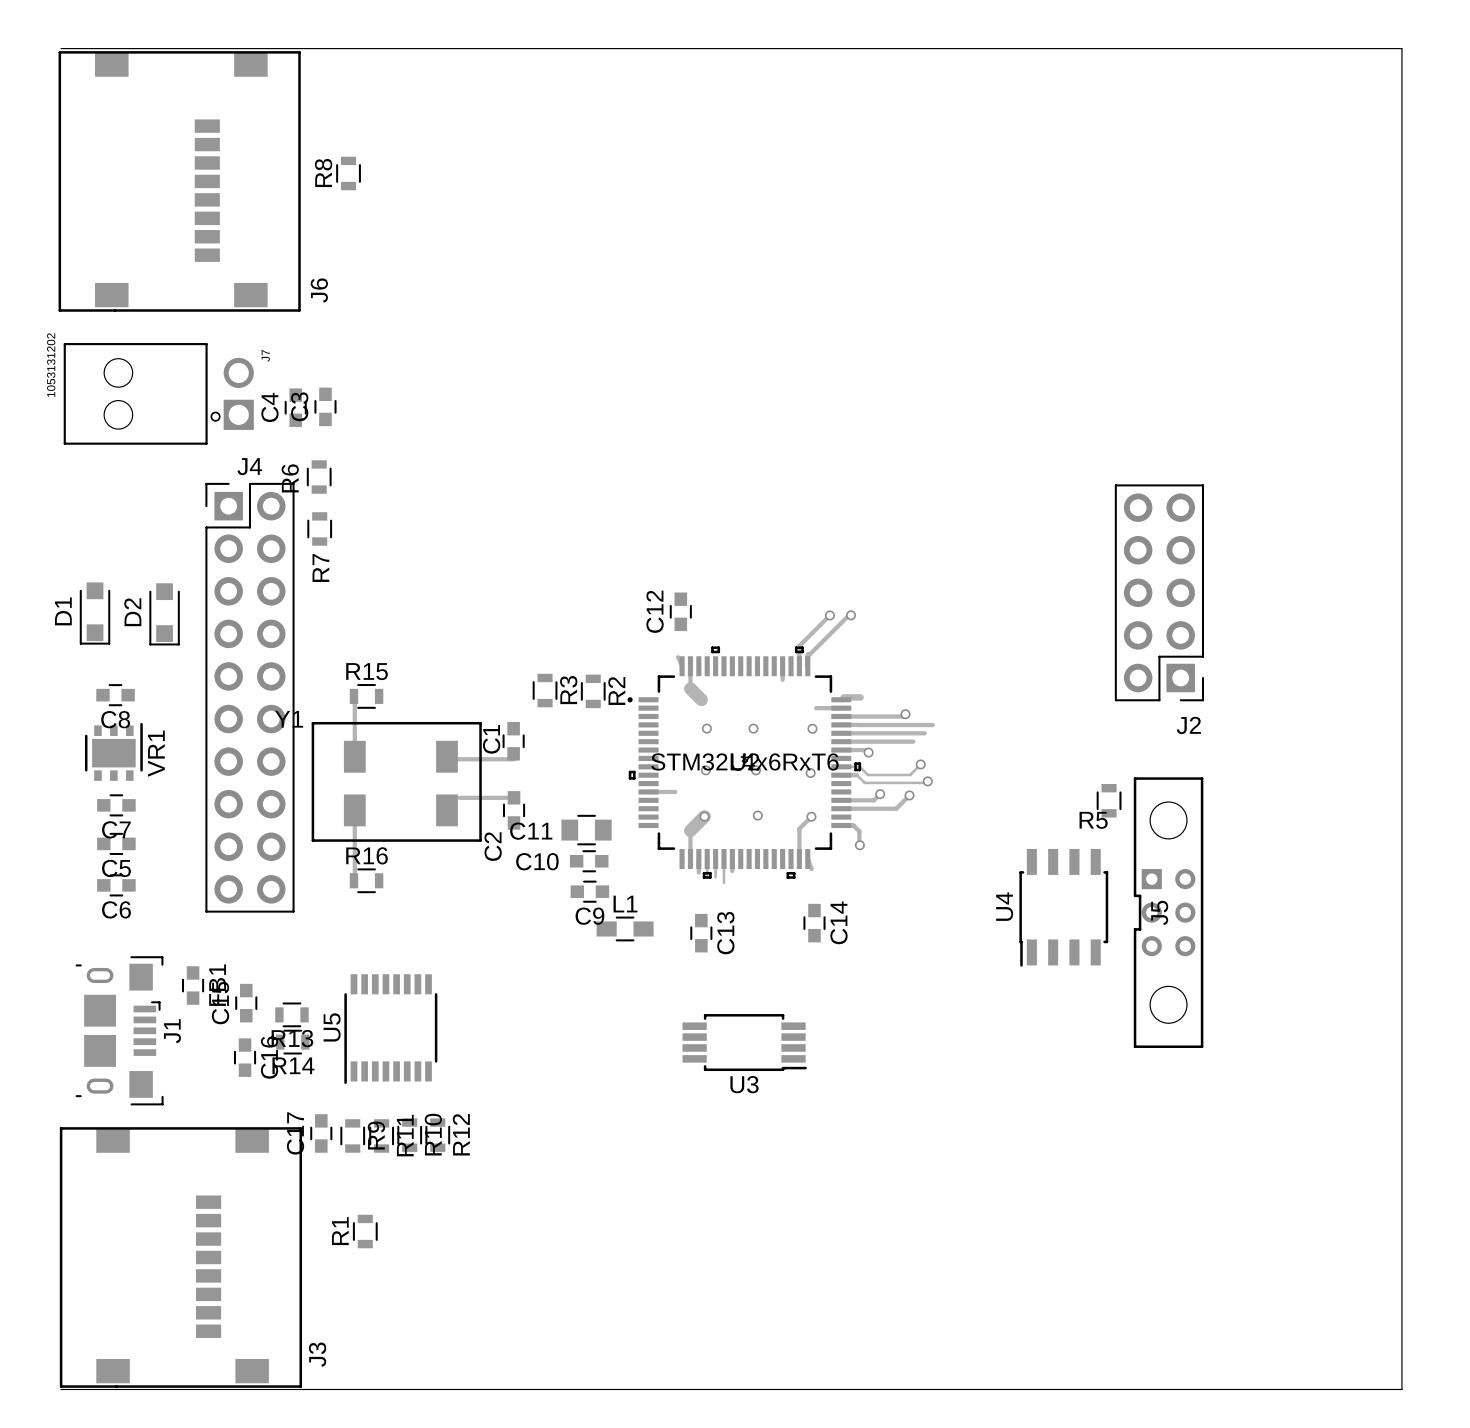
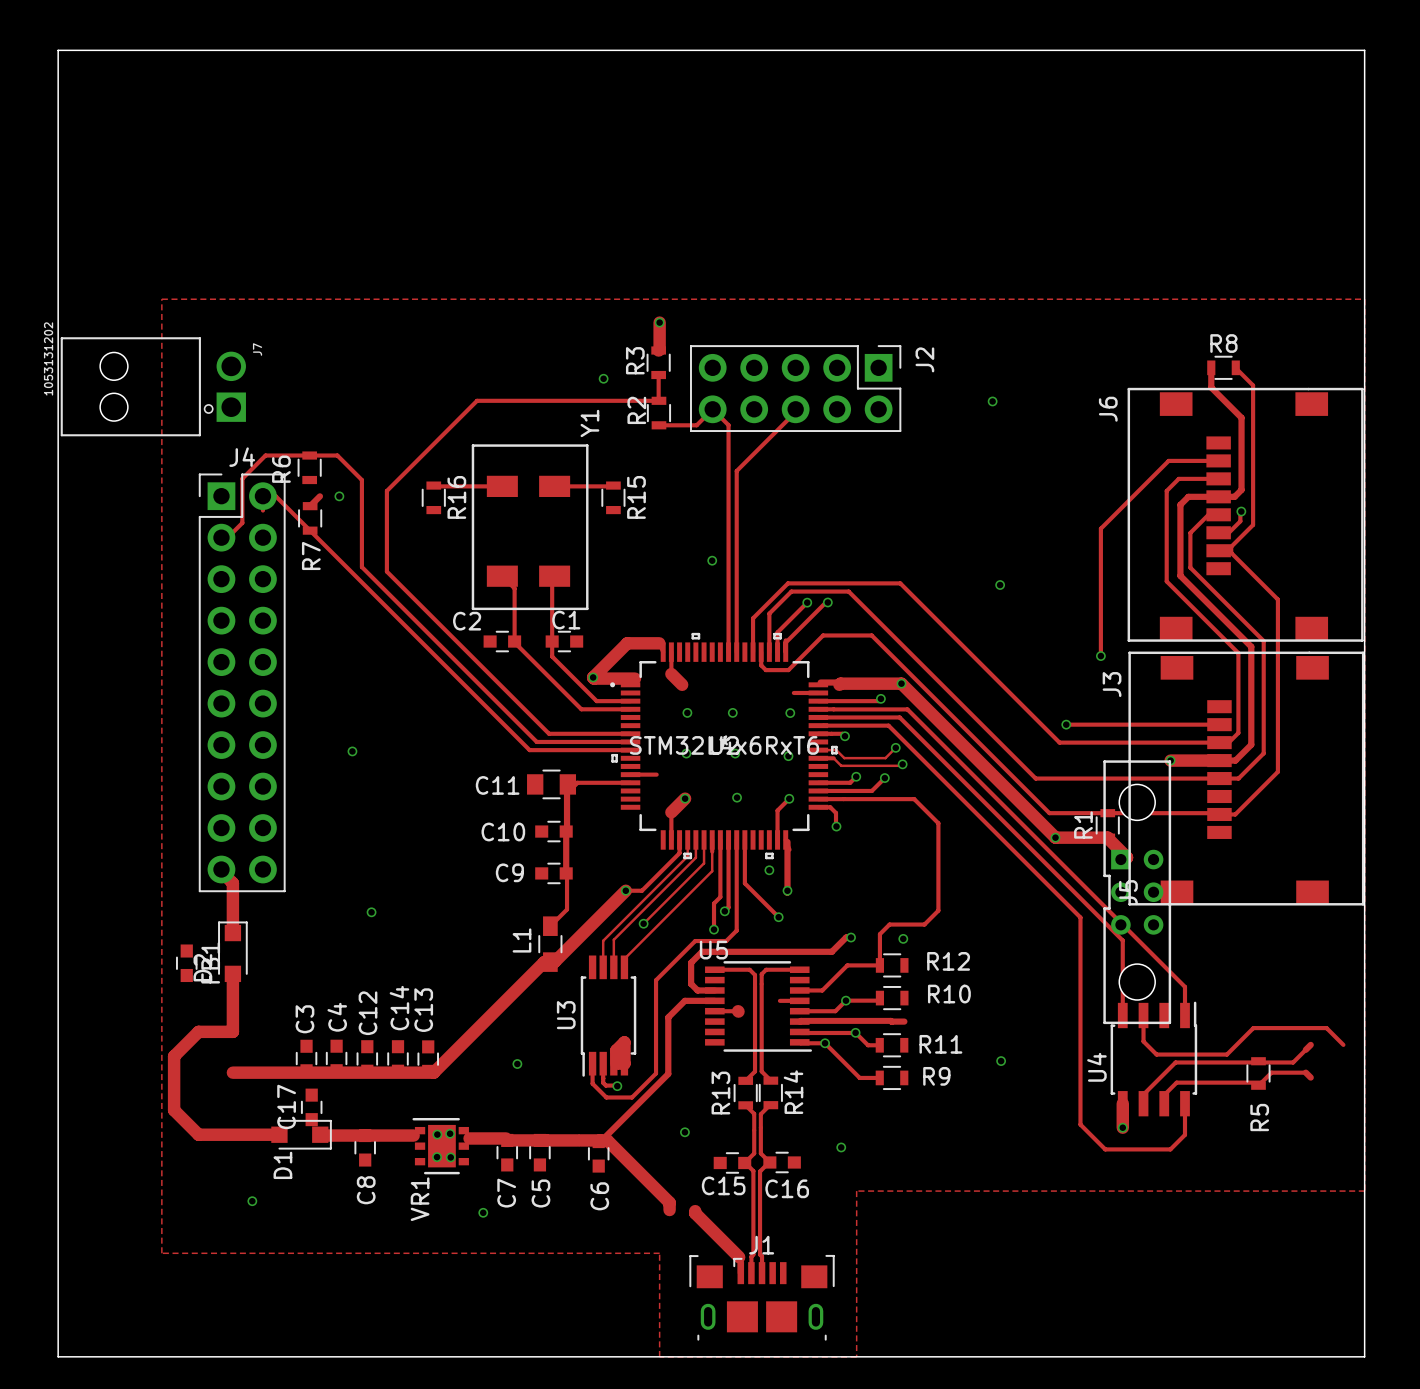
board edge: none -> (58, 50) (58, 1356)
R8 rotation: 0° (348, 173) -> 90° clockwise (1223, 367)
R8 position: (348, 173) -> (1223, 367)
J6 rotation: 0° (179, 181) -> 180° (1245, 514)
J6 position: (179, 181) -> (1245, 514)
zone outline: none -> (161, 299) (1364, 299) (1364, 1191) (856, 1191) (856, 1356) (659, 1356) (659, 1253) (161, 1253) (161, 299)
track: none -> (659, 322) (658, 350)
via: none -> (659, 322)
track: none -> (1211, 367) (1211, 387) (1241, 417) (1241, 489) (1234, 496) (1188, 496) (1180, 504) (1180, 575) (1251, 646) (1251, 744) (1235, 760) (1170, 760)
track: none -> (1235, 368) (1253, 385) (1253, 524) (1231, 546) (1231, 552)
track: none -> (658, 375) (658, 400) (477, 400) (386, 490) (386, 571) (549, 733) (630, 733)
via: none -> (603, 378)
C3 name position: C3 (299, 406) -> C3 (304, 1019)
C3 position: (325, 406) -> (306, 1058)
C4 name position: C4 (269, 407) -> C4 (337, 1017)
C4 position: (295, 407) -> (336, 1058)
via: none -> (992, 401)
track: none -> (795, 409) (795, 412) (736, 471) (736, 652)
track: none -> (658, 425) (696, 425) (712, 409) (728, 425) (728, 652)
track: none -> (1218, 460) (1168, 460) (1100, 528) (1100, 656)
track: none -> (1218, 478) (1178, 478) (1166, 490) (1166, 581) (1238, 653) (1238, 732) (1228, 742) (1059, 742) (900, 583) (787, 583) (753, 618) (753, 652)
track: none -> (433, 485) (502, 486)
track: none -> (613, 485) (554, 486)
track: none -> (319, 496) (310, 506)
via: none -> (339, 496)
track: none -> (262, 510) (262, 496) (275, 496) (529, 750) (630, 750)
track: none -> (1240, 511) (1240, 521) (1228, 532) (1218, 532)
via: none -> (1241, 511)
track: none -> (1218, 514) (1208, 514) (1190, 532) (1190, 567) (1263, 641) (1263, 753) (1238, 778) (1035, 778) (848, 591) (791, 591) (769, 613) (769, 652)
track: none -> (212, 537) (227, 537) (242, 522) (242, 478) (265, 455) (337, 455) (361, 480) (361, 567) (536, 741) (630, 741)
track: none -> (1218, 550) (1229, 550) (1277, 599) (1277, 771) (1235, 814) (1049, 813) (871, 635) (823, 635) (788, 670) (765, 670) (761, 665)
via: none -> (712, 560)
track: none -> (502, 576) (514, 588) (514, 642) (581, 709) (630, 709)
track: none -> (554, 576) (552, 578) (552, 656) (596, 701) (630, 701)
J2 rotation: 0° (1159, 592) -> 90° counterclockwise (795, 388)
J2 position: (1159, 592) -> (795, 388)
via: none -> (1000, 585)
C12 name position: C12 (655, 611) -> C12 (368, 1013)
C12 position: (680, 611) -> (367, 1058)
D1 rotation: 0° (95, 613) -> 90° counterclockwise (301, 1134)
D1 position: (95, 613) -> (301, 1134)
D2 rotation: 0° (164, 614) -> 180° (232, 951)
D2 position: (164, 614) -> (232, 951)
track: none -> (659, 643) (627, 643) (593, 677)
via: none -> (1100, 656)
R3 position: (545, 690) -> (658, 362)
R3 name position: R3 (568, 690) -> R3 (635, 360)
R2 position: (593, 691) -> (658, 413)
R2 name position: R2 (616, 691) -> R2 (636, 410)
track: none -> (593, 677) (634, 678)
via: none -> (593, 677)
C8 rotation: 0° (115, 695) -> 90° clockwise (365, 1147)
C8 position: (115, 695) -> (365, 1147)
R15 rotation: 0° (366, 696) -> 90° clockwise (613, 497)
R15 position: (366, 696) -> (613, 497)
track: (354, 697) (354, 756) -> none
track: none -> (837, 682) (839, 684) (901, 683) (1055, 837) (1107, 837) (1127, 857)
via: none -> (901, 683)
track: none -> (907, 709) (1185, 986) (1185, 1015)
track: none -> (899, 717) (1122, 940) (1122, 1015)
track: none -> (1066, 724) (1219, 724)
via: none -> (1066, 724)
C1 rotation: 0° (513, 741) -> 90° clockwise (564, 641)
C1 position: (513, 741) -> (564, 641)
track: none -> (888, 725) (1080, 917) (1080, 1124) (1105, 1149) (1170, 1149) (1185, 1134) (1185, 1103)
VR1 rotation: 0° (113, 751) -> 90° counterclockwise (440, 1146)
VR1 position: (113, 751) -> (440, 1146)
VR1 name position: VR1 (156, 753) -> VR1 (420, 1199)
track: (449, 759) (514, 759) -> none
via: none -> (352, 751)
via: none -> (1170, 760)
Y1 rotation: 0° (396, 781) -> 90° clockwise (530, 527)
Y1 position: (396, 781) -> (530, 527)
track: (459, 797) (514, 797) -> none
track: none -> (577, 782) (567, 793) (567, 909) (550, 926)
track: none -> (630, 782) (569, 782) (567, 784)
R5 position: (1109, 800) -> (1258, 1073)
C7 rotation: 0° (116, 805) -> 90° clockwise (507, 1152)
C7 position: (116, 805) -> (507, 1152)
track: (354, 810) (354, 879) -> none
C2 rotation: 0° (514, 810) -> 90° clockwise (502, 641)
C2 position: (514, 810) -> (502, 641)
track: none -> (818, 799) (914, 799) (938, 823) (938, 910) (924, 924) (889, 924) (879, 934) (879, 965) (847, 965) (822, 990) (799, 990)
R5 name rotation: 0° (1093, 820) -> 90° counterclockwise (1259, 1117)
C11 position: (586, 830) -> (551, 784)
C5 rotation: 0° (116, 843) -> 90° clockwise (539, 1152)
C5 position: (116, 843) -> (539, 1152)
via: none -> (1055, 837)
track: none -> (720, 839) (720, 897) (714, 903) (714, 929)
track: none -> (728, 839) (728, 907) (724, 911)
track: none -> (736, 839) (736, 930) (726, 941) (695, 941) (656, 980) (656, 1073) (632, 1097) (606, 1097) (592, 1083) (592, 1063)
track: none -> (744, 839) (744, 883) (778, 917)
C10 position: (589, 861) -> (553, 831)
track: none -> (787, 841) (787, 892)
track: none -> (712, 851) (712, 871) (624, 958) (624, 967)
track: none -> (679, 853) (641, 890) (625, 890) (554, 962) (544, 962) (433, 1072) (232, 1072)
track: none -> (687, 856) (603, 940) (603, 967)
track: none -> (695, 857) (613, 939) (613, 967)
R16 rotation: 0° (366, 880) -> 90° clockwise (433, 497)
R16 position: (366, 880) -> (433, 497)
track: none -> (704, 863) (643, 923)
C6 rotation: 0° (116, 885) -> 90° clockwise (598, 1153)
C6 position: (116, 885) -> (598, 1153)
track: none -> (221, 869) (232, 883) (232, 933)
via: none -> (769, 870)
C9 position: (589, 891) -> (553, 873)
L1 name position: L1 (625, 904) -> L1 (522, 940)
U4 rotation: 0° (1063, 907) -> 180° (1153, 1058)
U4 position: (1063, 907) -> (1153, 1058)
via: none -> (625, 890)
via: none -> (787, 890)
C9 name position: C9 (589, 916) -> C9 (509, 872)
C14 name position: C14 (838, 922) -> C14 (399, 1008)
C14 position: (814, 923) -> (398, 1058)
L1 rotation: 0° (625, 928) -> 90° clockwise (550, 944)
L1 position: (625, 928) -> (550, 944)
via: none -> (724, 911)
via: none -> (371, 912)
C13 position: (701, 933) -> (428, 1059)
C13 name position: C13 (725, 933) -> C13 (423, 1010)
via: none -> (778, 917)
via: none -> (643, 923)
via: none -> (714, 929)
track: none -> (851, 937) (846, 937) (831, 951) (702, 951) (691, 962) (691, 983) (697, 990) (714, 990)
via: none -> (851, 937)
via: none -> (903, 938)
track: none -> (714, 969) (749, 969) (755, 975) (755, 1071) (745, 1080)
track: none -> (799, 969) (766, 969) (761, 974) (761, 1071) (770, 1080)
track: none -> (232, 973) (232, 1031) (198, 1031) (174, 1056) (174, 1110) (198, 1134) (279, 1134)
C15 rotation: 0° (246, 1003) -> 90° clockwise (732, 1162)
C15 position: (246, 1003) -> (732, 1162)
R13 rotation: 0° (291, 1014) -> 90° clockwise (745, 1093)
R13 position: (291, 1014) -> (745, 1093)
track: none -> (879, 998) (877, 1000) (845, 1000) (835, 1011) (799, 1011)
via: none -> (845, 1000)
track: none -> (714, 1000) (684, 1000) (668, 1017) (668, 1073) (600, 1140)
track: none -> (779, 1000) (799, 1000)
U5 name position: U5 (332, 1027) -> U5 (713, 950)
U5 rotation: 0° (390, 1029) -> 90° counterclockwise (758, 1006)
U5 position: (390, 1029) -> (758, 1006)
J1 rotation: 0° (119, 1030) -> 90° counterclockwise (762, 1297)
J1 position: (119, 1030) -> (762, 1297)
track: none -> (714, 1011) (738, 1011)
track: none -> (1143, 1015) (1143, 1041) (1156, 1054) (1226, 1054) (1253, 1028) (1326, 1028) (1343, 1044)
R14 rotation: 0° (292, 1042) -> 90° clockwise (770, 1092)
R14 position: (292, 1042) -> (770, 1092)
U3 rotation: 0° (744, 1042) -> 90° clockwise (608, 1016)
U3 position: (744, 1042) -> (608, 1016)
track: none -> (799, 1021) (904, 1021)
track: none -> (799, 1031) (855, 1032)
track: none -> (855, 1032) (868, 1045) (879, 1045)
via: none -> (855, 1032)
C16 rotation: 0° (245, 1057) -> 90° clockwise (782, 1162)
C16 position: (245, 1057) -> (782, 1162)
R14 name position: R14 (293, 1065) -> R14 (793, 1092)
track: none -> (799, 1042) (825, 1043) (859, 1077) (879, 1077)
via: none -> (825, 1043)
track: none -> (1310, 1044) (1293, 1062) (1175, 1062) (1143, 1094) (1143, 1103)
via: none -> (1001, 1061)
via: none -> (517, 1064)
track: none -> (603, 1063) (603, 1082) (605, 1085) (617, 1086)
track: none -> (616, 1063) (616, 1050) (624, 1042) (624, 1063) (620, 1063)
track: none -> (1310, 1077) (1305, 1072) (1271, 1072) (1261, 1082) (1176, 1082) (1164, 1095) (1164, 1103)
via: none -> (617, 1086)
track: none -> (1122, 1103) (1122, 1127)
track: none -> (745, 1105) (754, 1113) (754, 1153) (744, 1162)
track: none -> (773, 1105) (770, 1105) (760, 1114) (760, 1153) (769, 1162)
R10 name position: R10 (433, 1134) -> R10 (949, 994)
R9 rotation: 0° (352, 1135) -> 90° clockwise (892, 1077)
R9 position: (352, 1135) -> (892, 1077)
R11 rotation: 0° (381, 1135) -> 90° clockwise (892, 1045)
R11 position: (381, 1135) -> (892, 1045)
R10 rotation: 0° (409, 1135) -> 90° clockwise (892, 998)
R10 position: (409, 1135) -> (892, 998)
R12 rotation: 0° (437, 1135) -> 90° clockwise (892, 965)
R12 position: (437, 1135) -> (892, 965)
via: none -> (1122, 1127)
via: none -> (684, 1132)
via: none -> (450, 1133)
track: none -> (320, 1134) (413, 1135)
via: none -> (437, 1134)
track: none -> (469, 1138) (506, 1138)
track: none -> (506, 1139) (607, 1140) (669, 1202) (669, 1210)
via: none -> (841, 1147)
via: none -> (437, 1157)
via: none -> (450, 1157)
track: none -> (745, 1162) (753, 1171) (753, 1254) (751, 1256) (751, 1273)
track: none -> (771, 1162) (760, 1171) (760, 1254) (762, 1256) (762, 1273)
via: none -> (252, 1201)
R1 position: (365, 1231) -> (1107, 825)
track: none -> (694, 1210) (739, 1257)
via: none -> (483, 1212)
J3 rotation: 0° (180, 1257) -> 180° (1246, 778)
J3 position: (180, 1257) -> (1246, 778)

